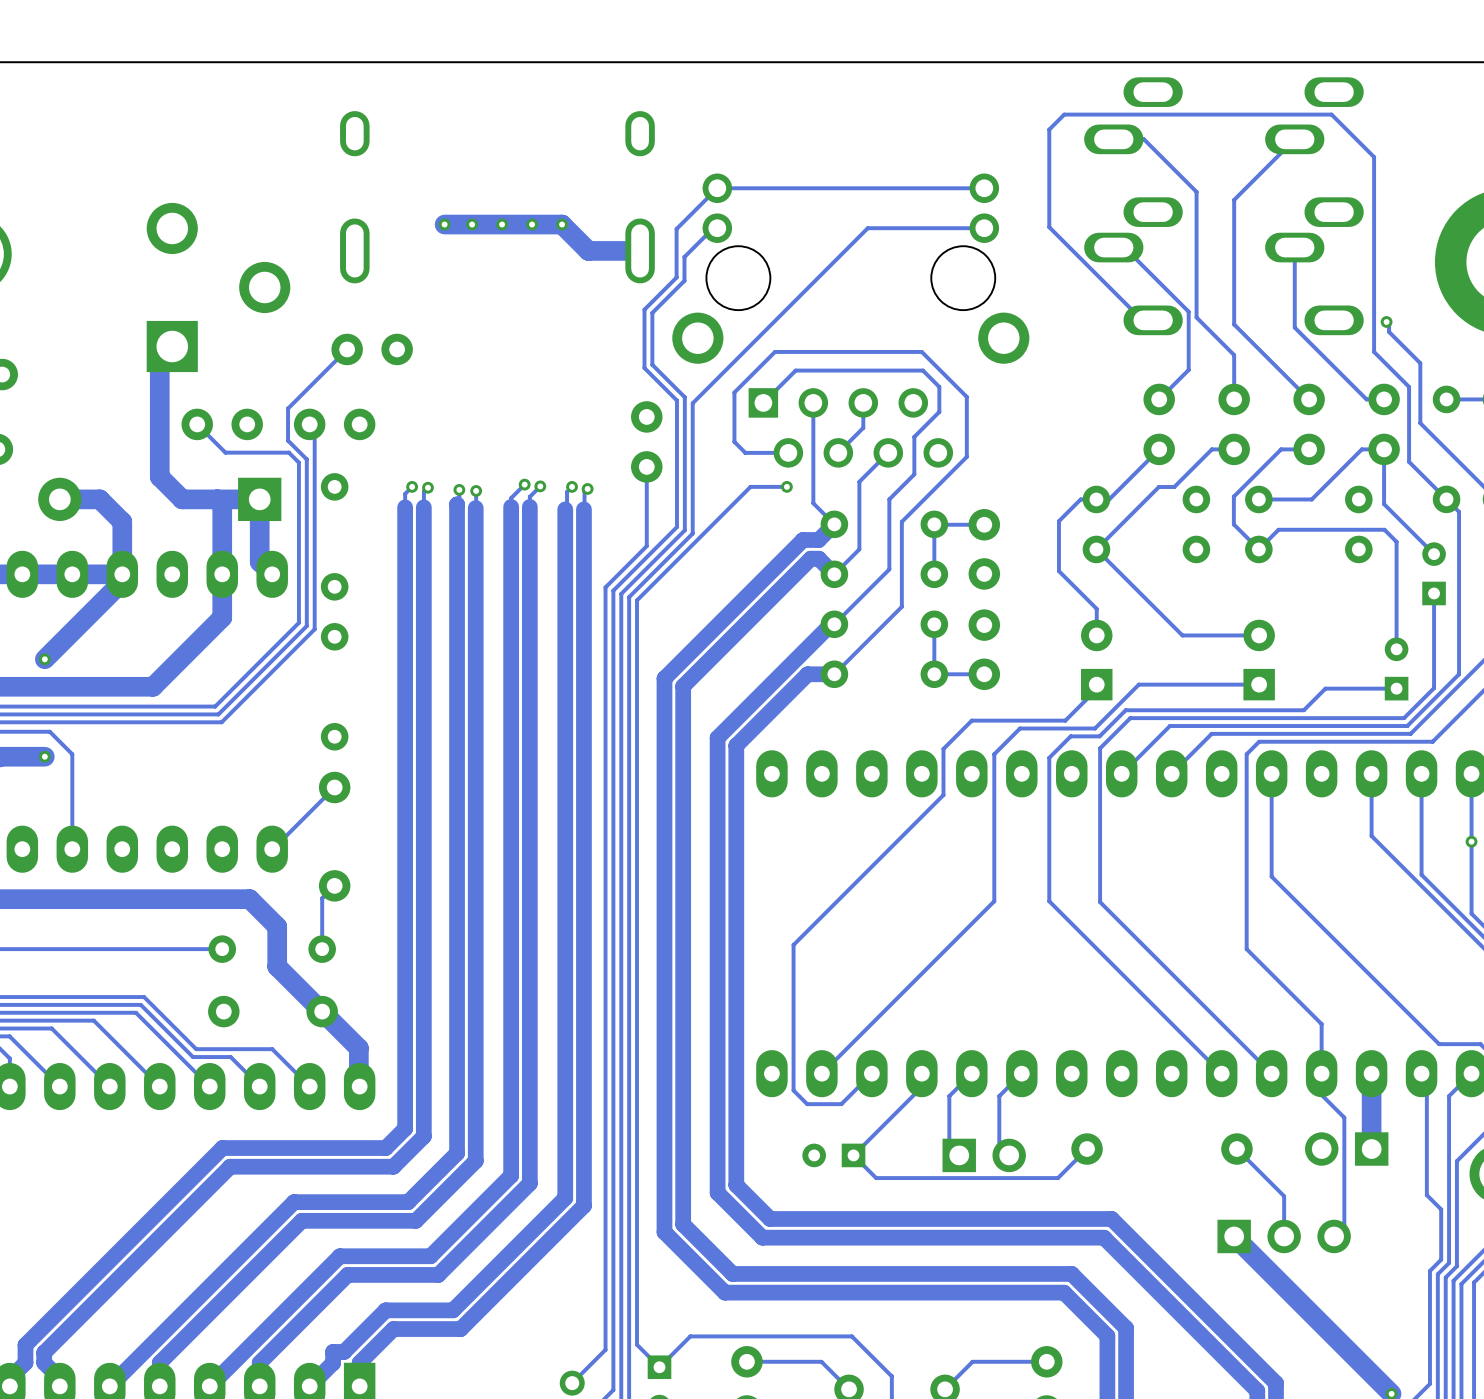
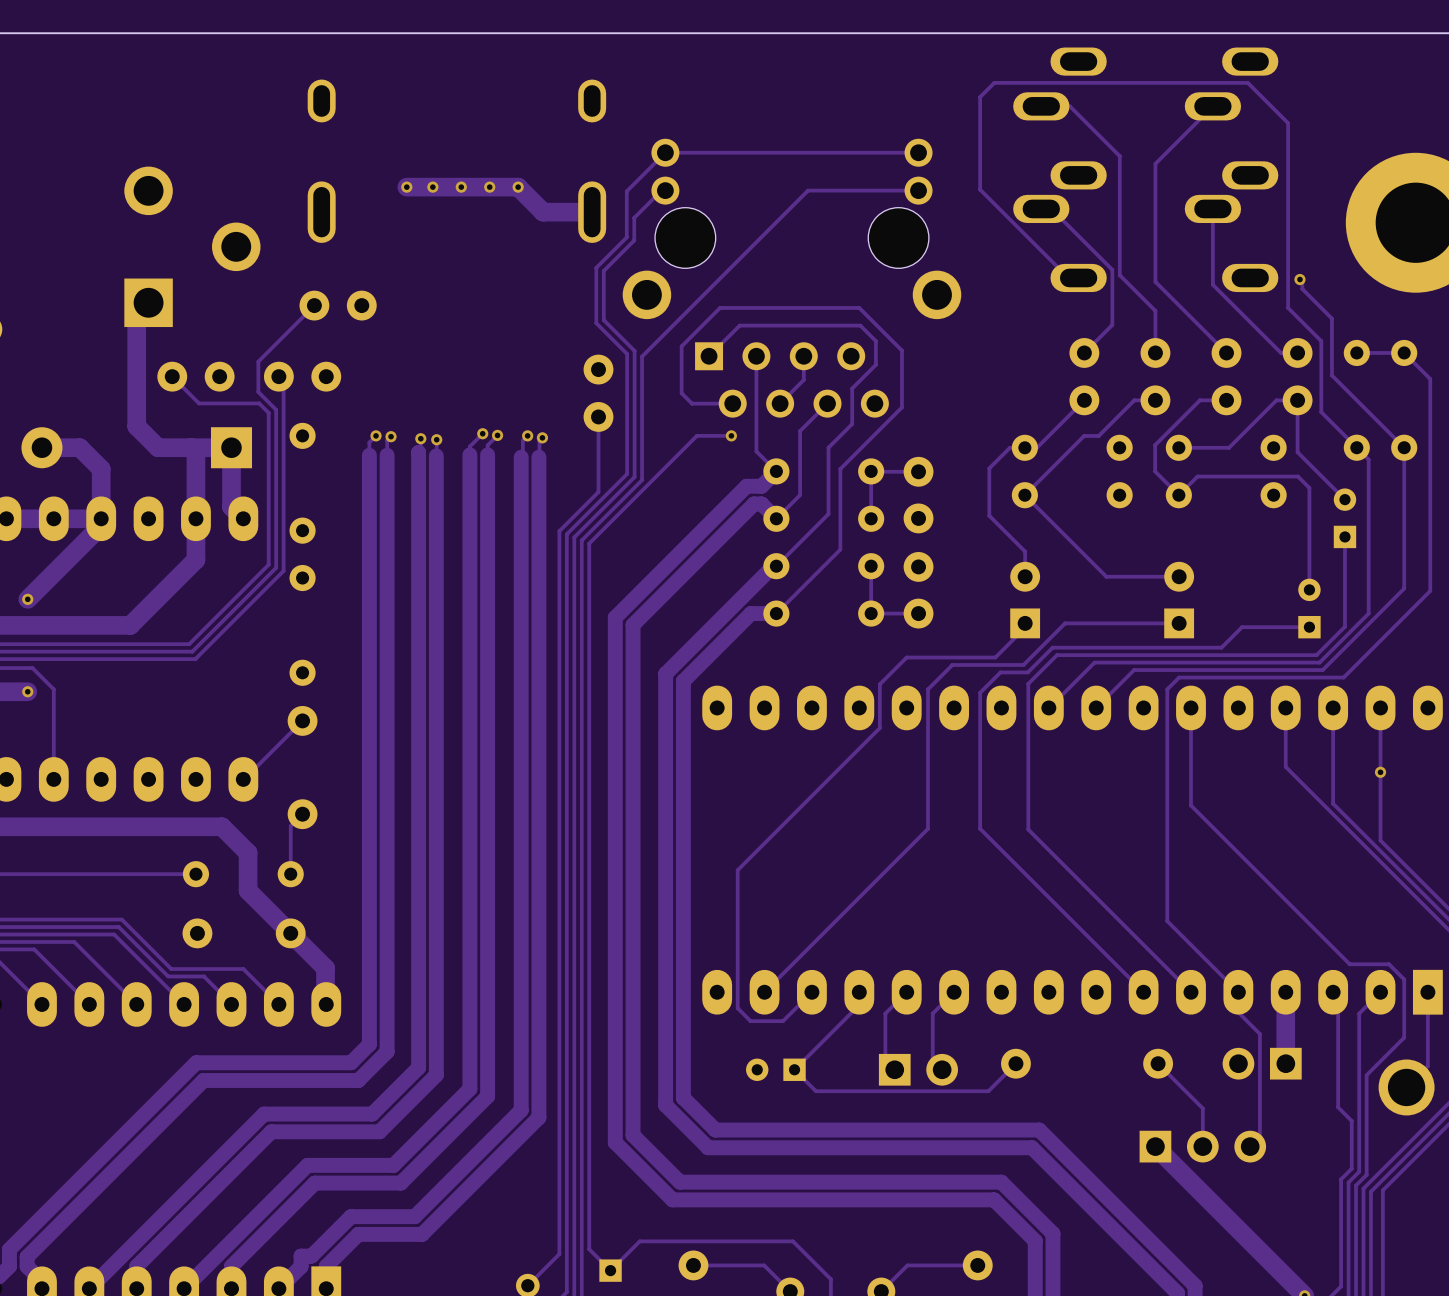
track: (1246, 949) (1321, 1024) (1321, 1073) -> (1167, 874) (1167, 921) (1238, 992)

